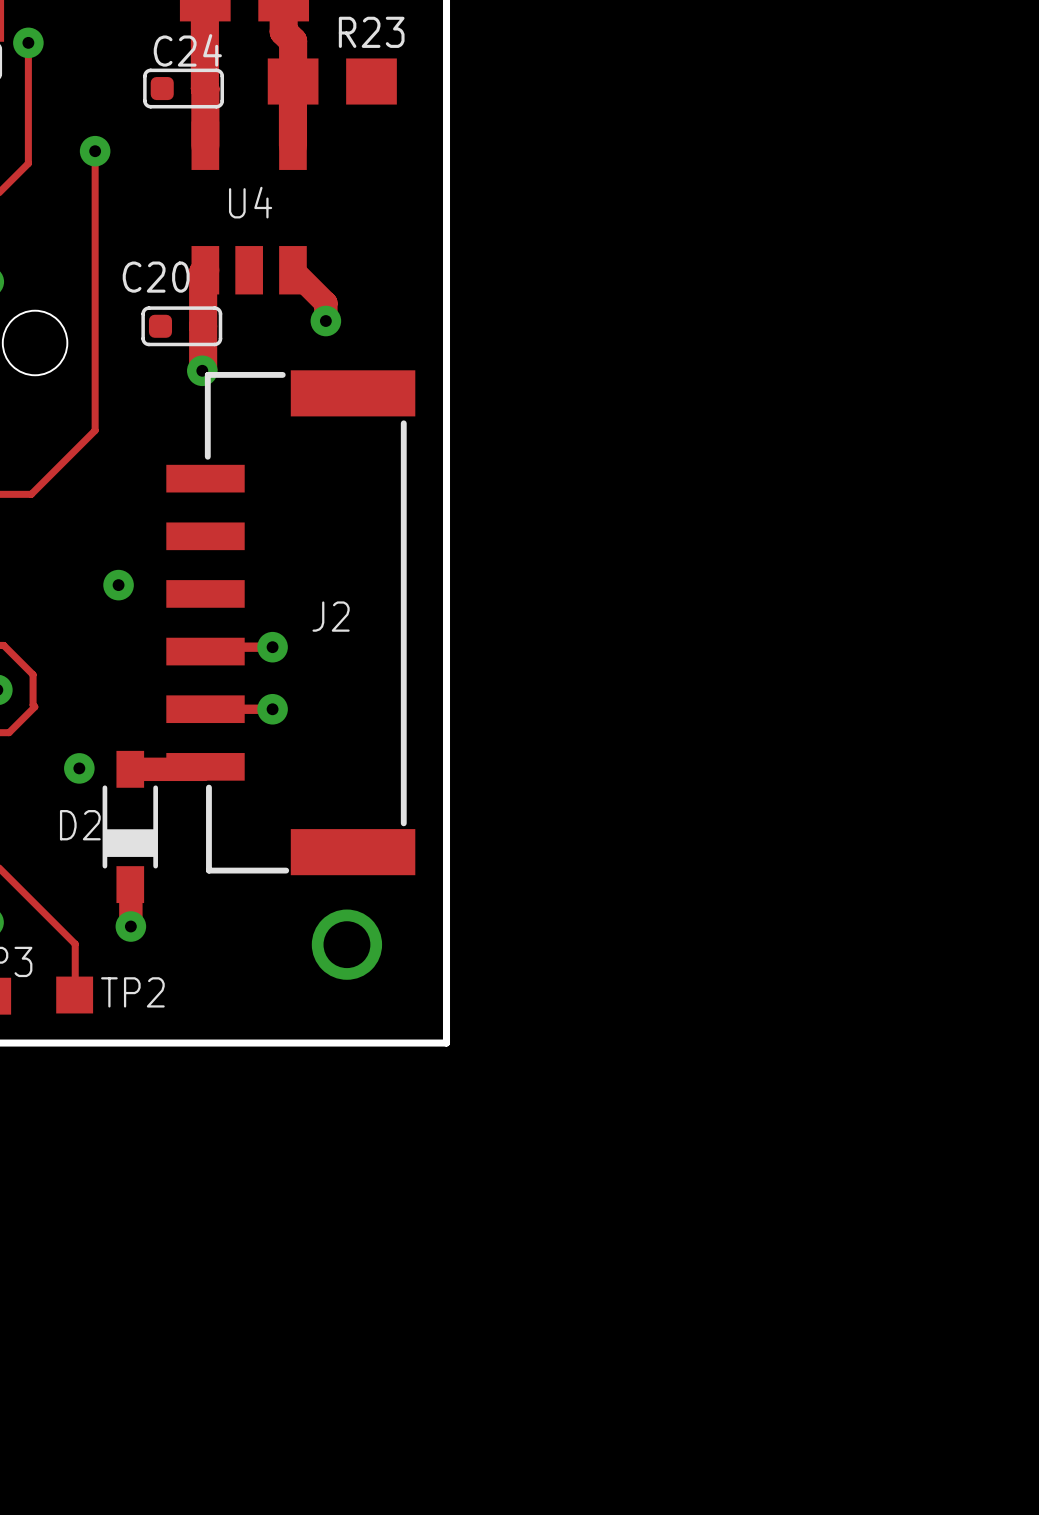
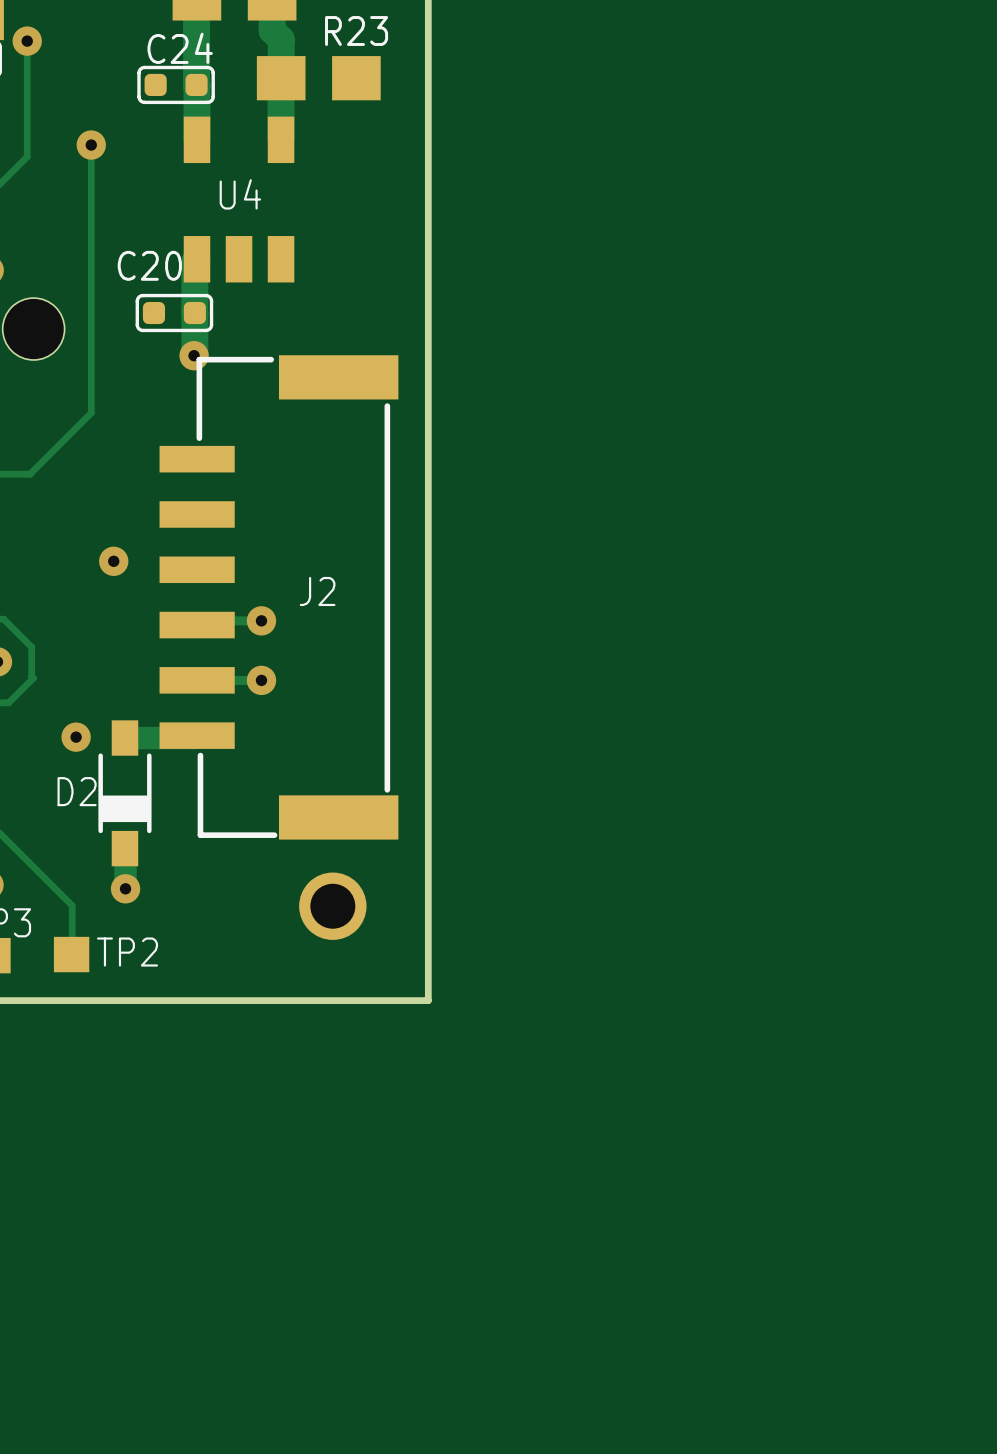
track: (292, 270) (325, 303) (325, 321) -> none
via: (325, 321) -> none

